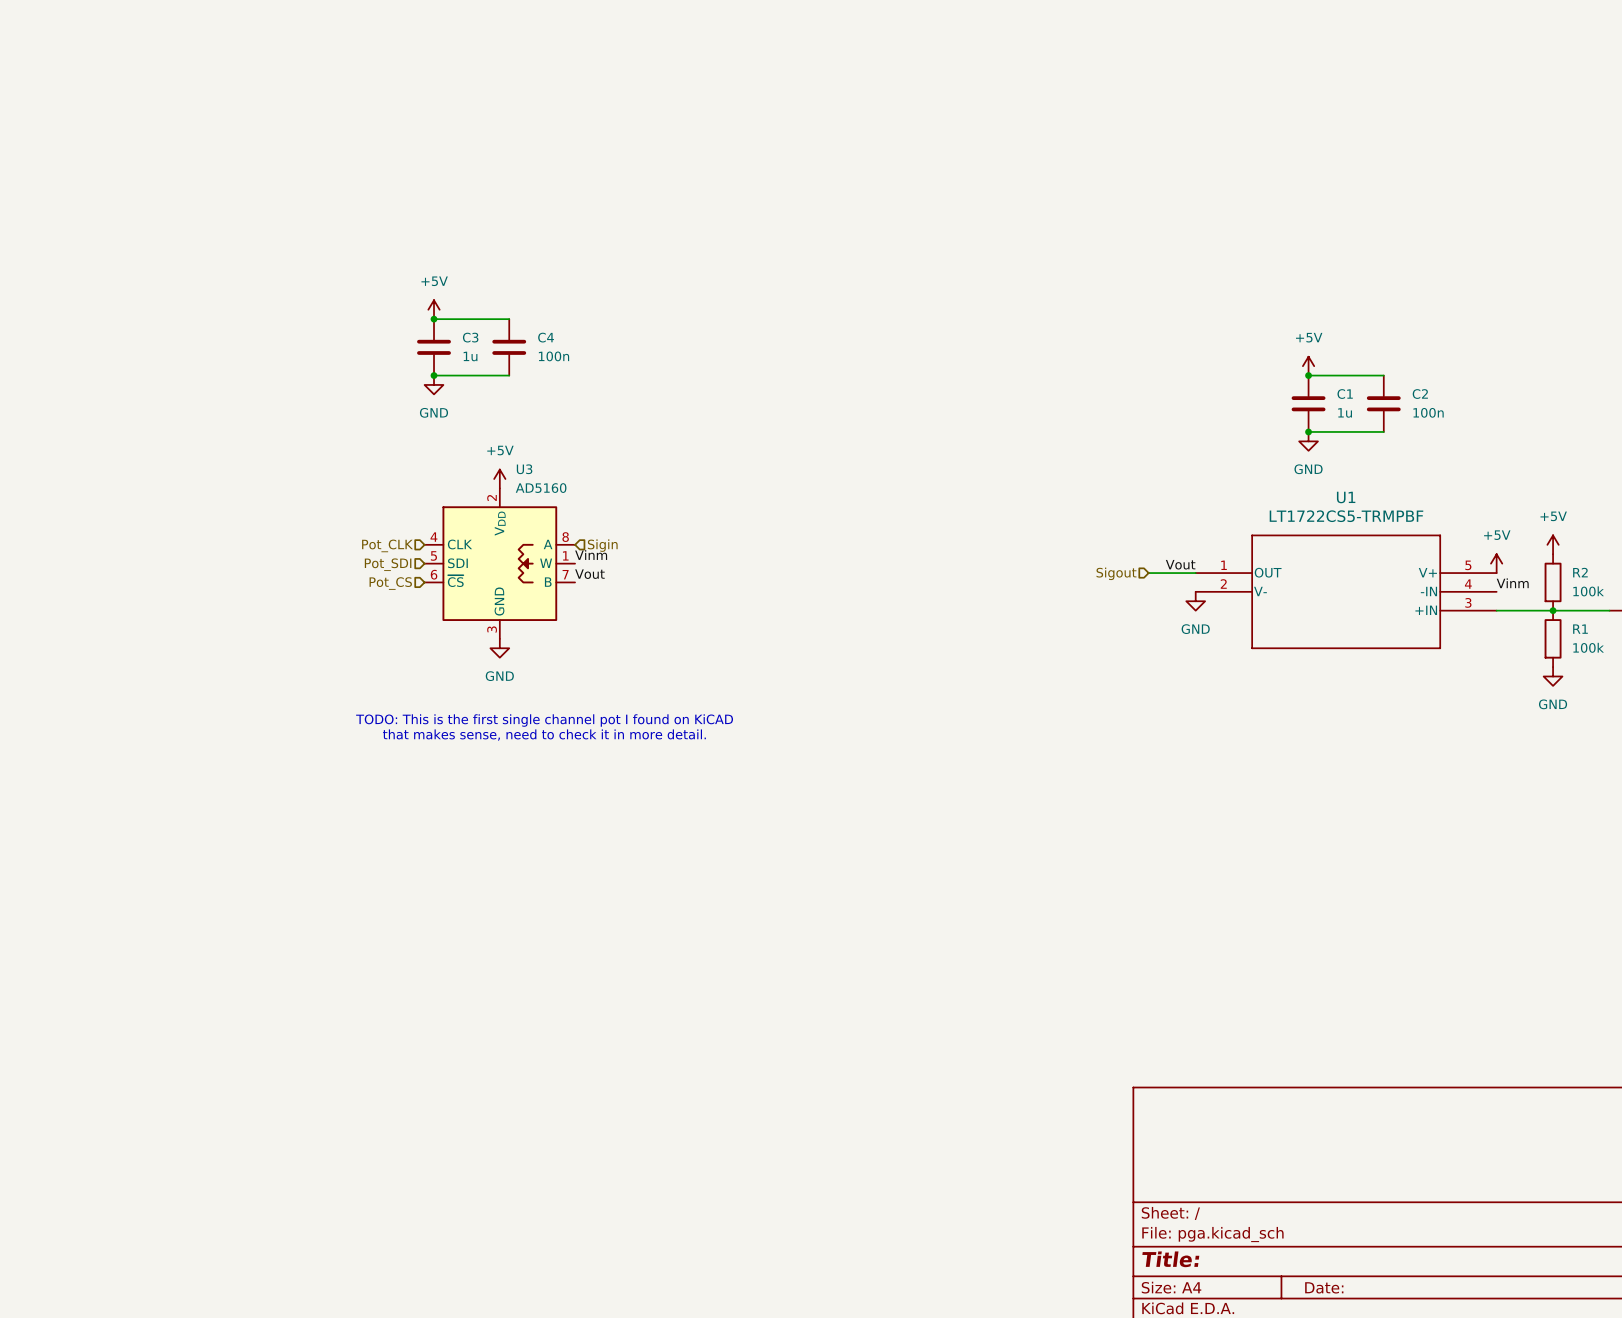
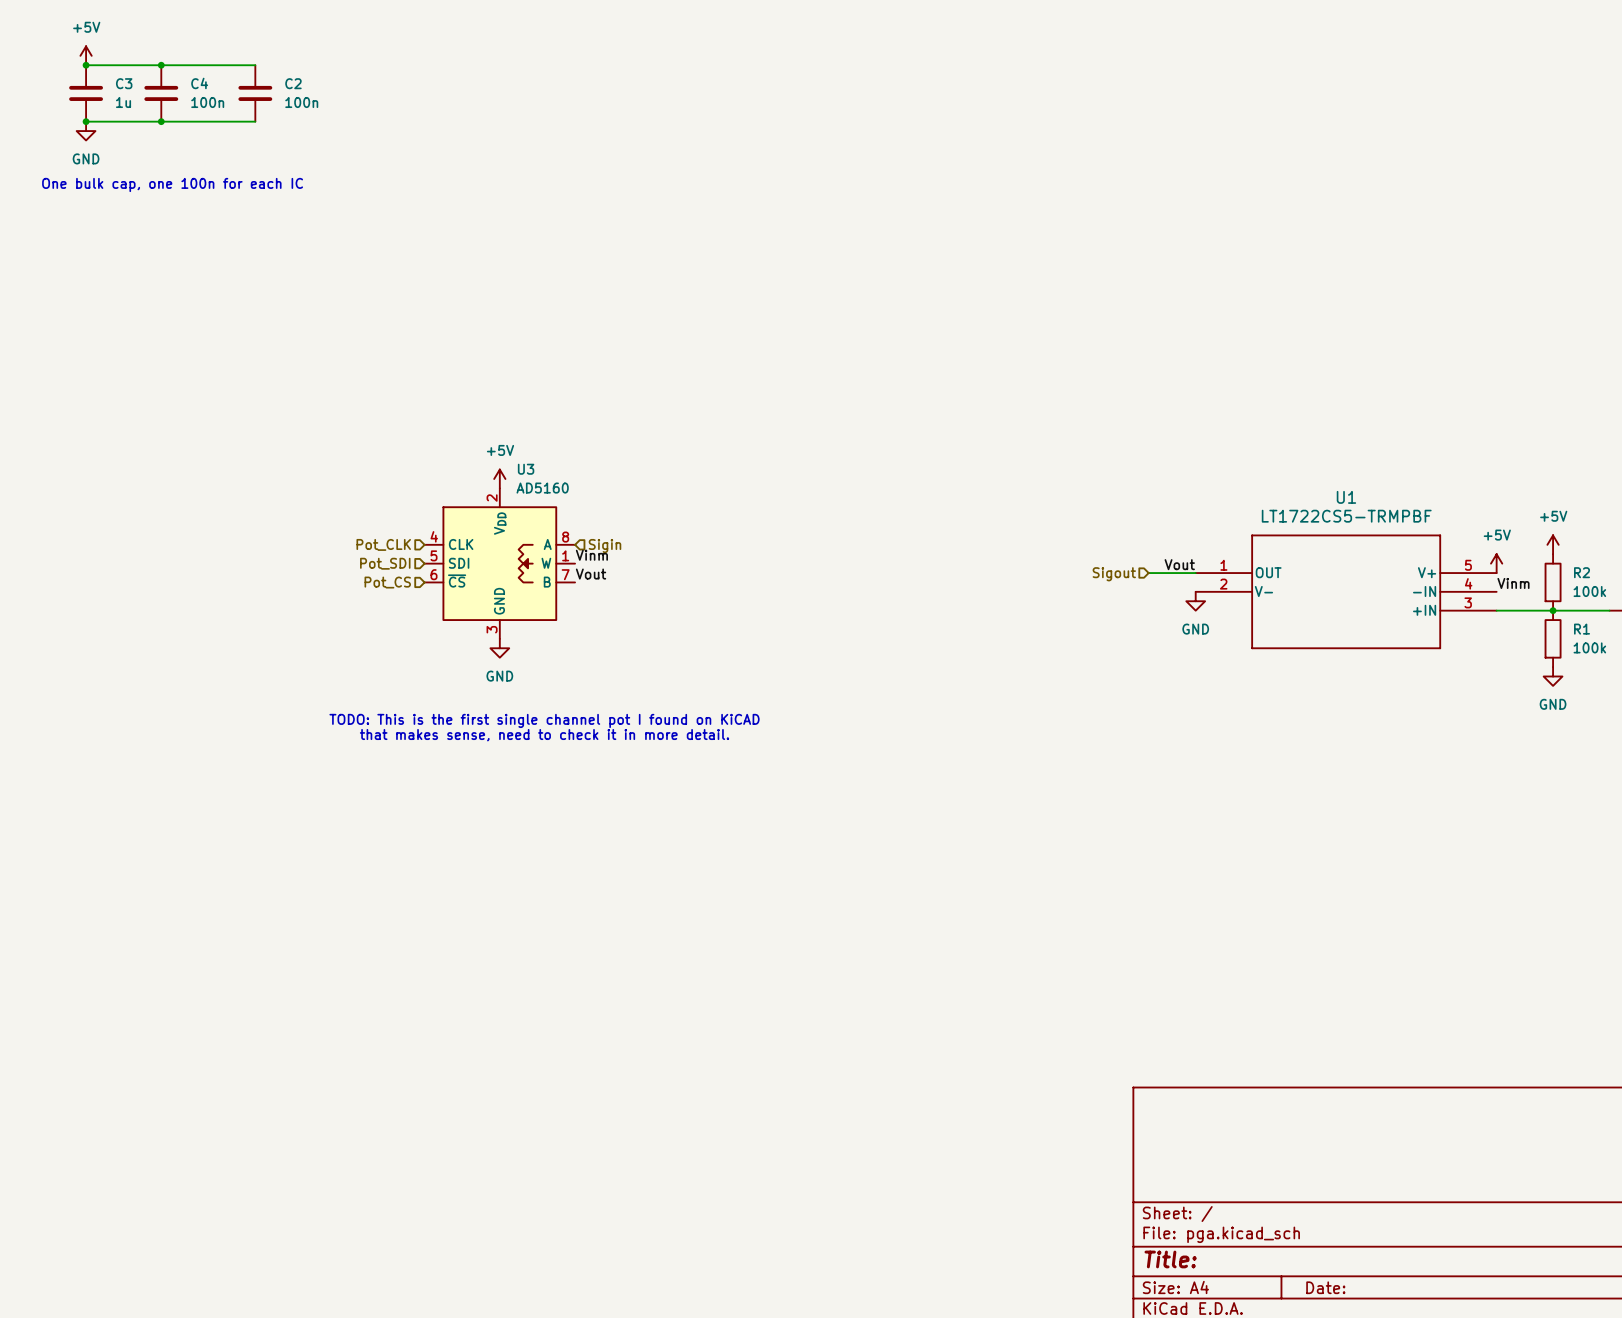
power symbol: none -> +5V (86, 55)
wire: none -> (86, 65) (255, 65)
junction: none -> (86, 65)
junction: none -> (161, 65)
wire: none -> (86, 121) (255, 121)
junction: none -> (86, 121)
junction: none -> (161, 121)
power symbol: none -> GND (86, 131)
text: none -> One bulk cap, one 100n for each IC (172, 184)
power symbol: +5V (434, 309) -> none
wire: (434, 319) (509, 319) -> none
junction: (434, 319) -> none
C3 position: (434, 347) -> (86, 93)
C4 position: (509, 347) -> (161, 93)
power symbol: +5V (1308, 366) -> none
wire: (434, 375) (509, 375) -> none
junction: (434, 375) -> none
wire: (1308, 375) (1383, 375) -> none
junction: (1308, 375) -> none
power symbol: GND (434, 384) -> none
C1: 1u (1308, 403) -> none
C2 position: (1383, 403) -> (255, 93)
wire: (1308, 431) (1383, 431) -> none
junction: (1308, 431) -> none
power symbol: GND (1308, 441) -> none

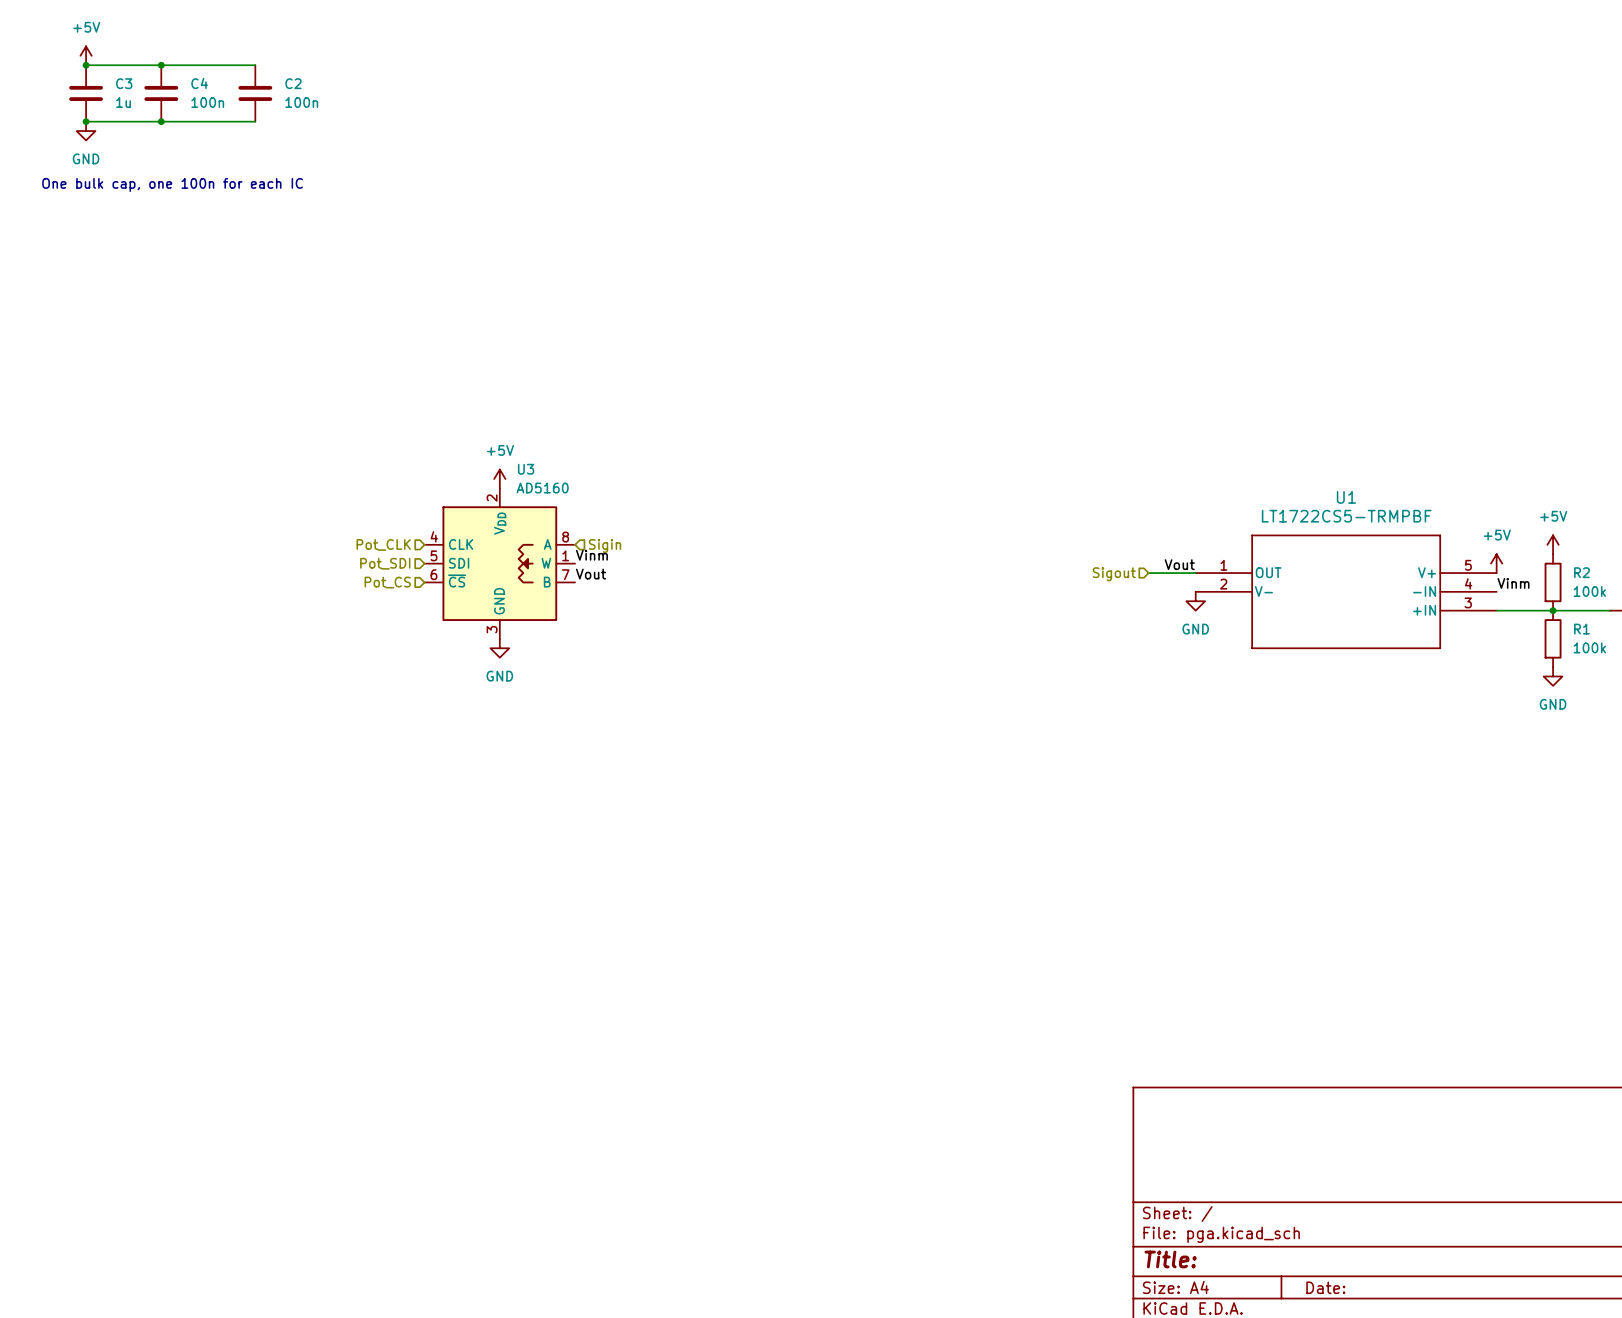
text: TODO: This is the first single channel pot I found on KiCAD (544, 720) -> none
text: that makes sense, need to check it in more detail. (544, 735) -> none

